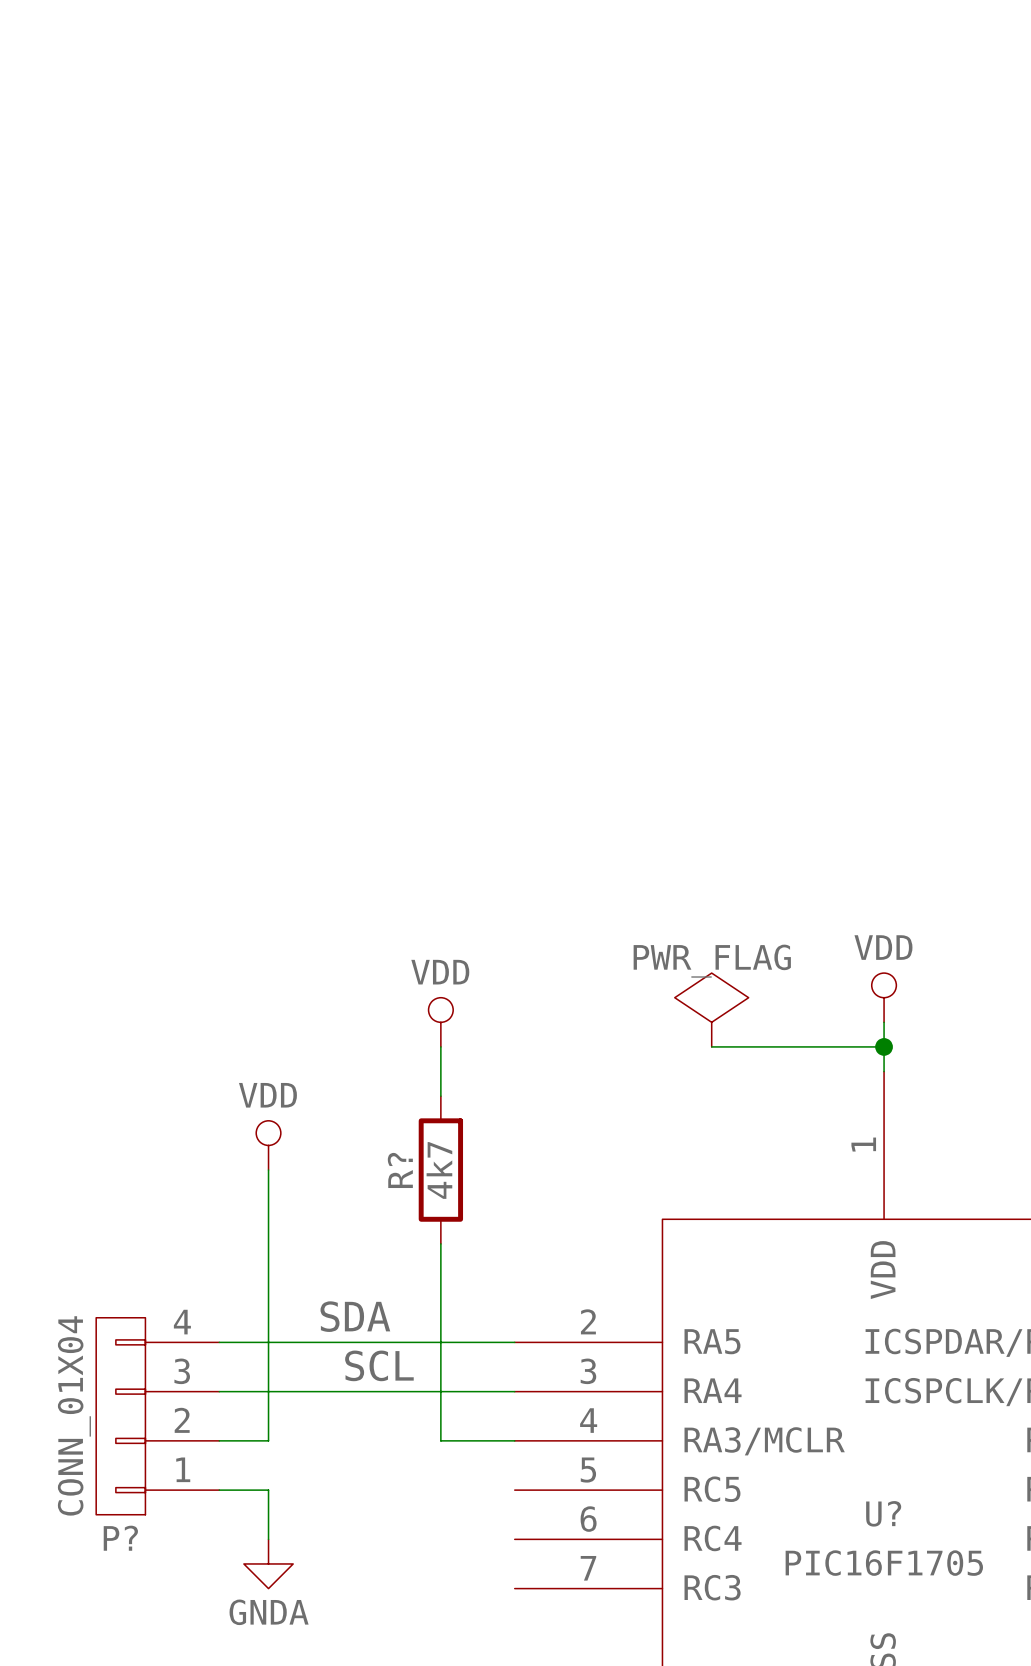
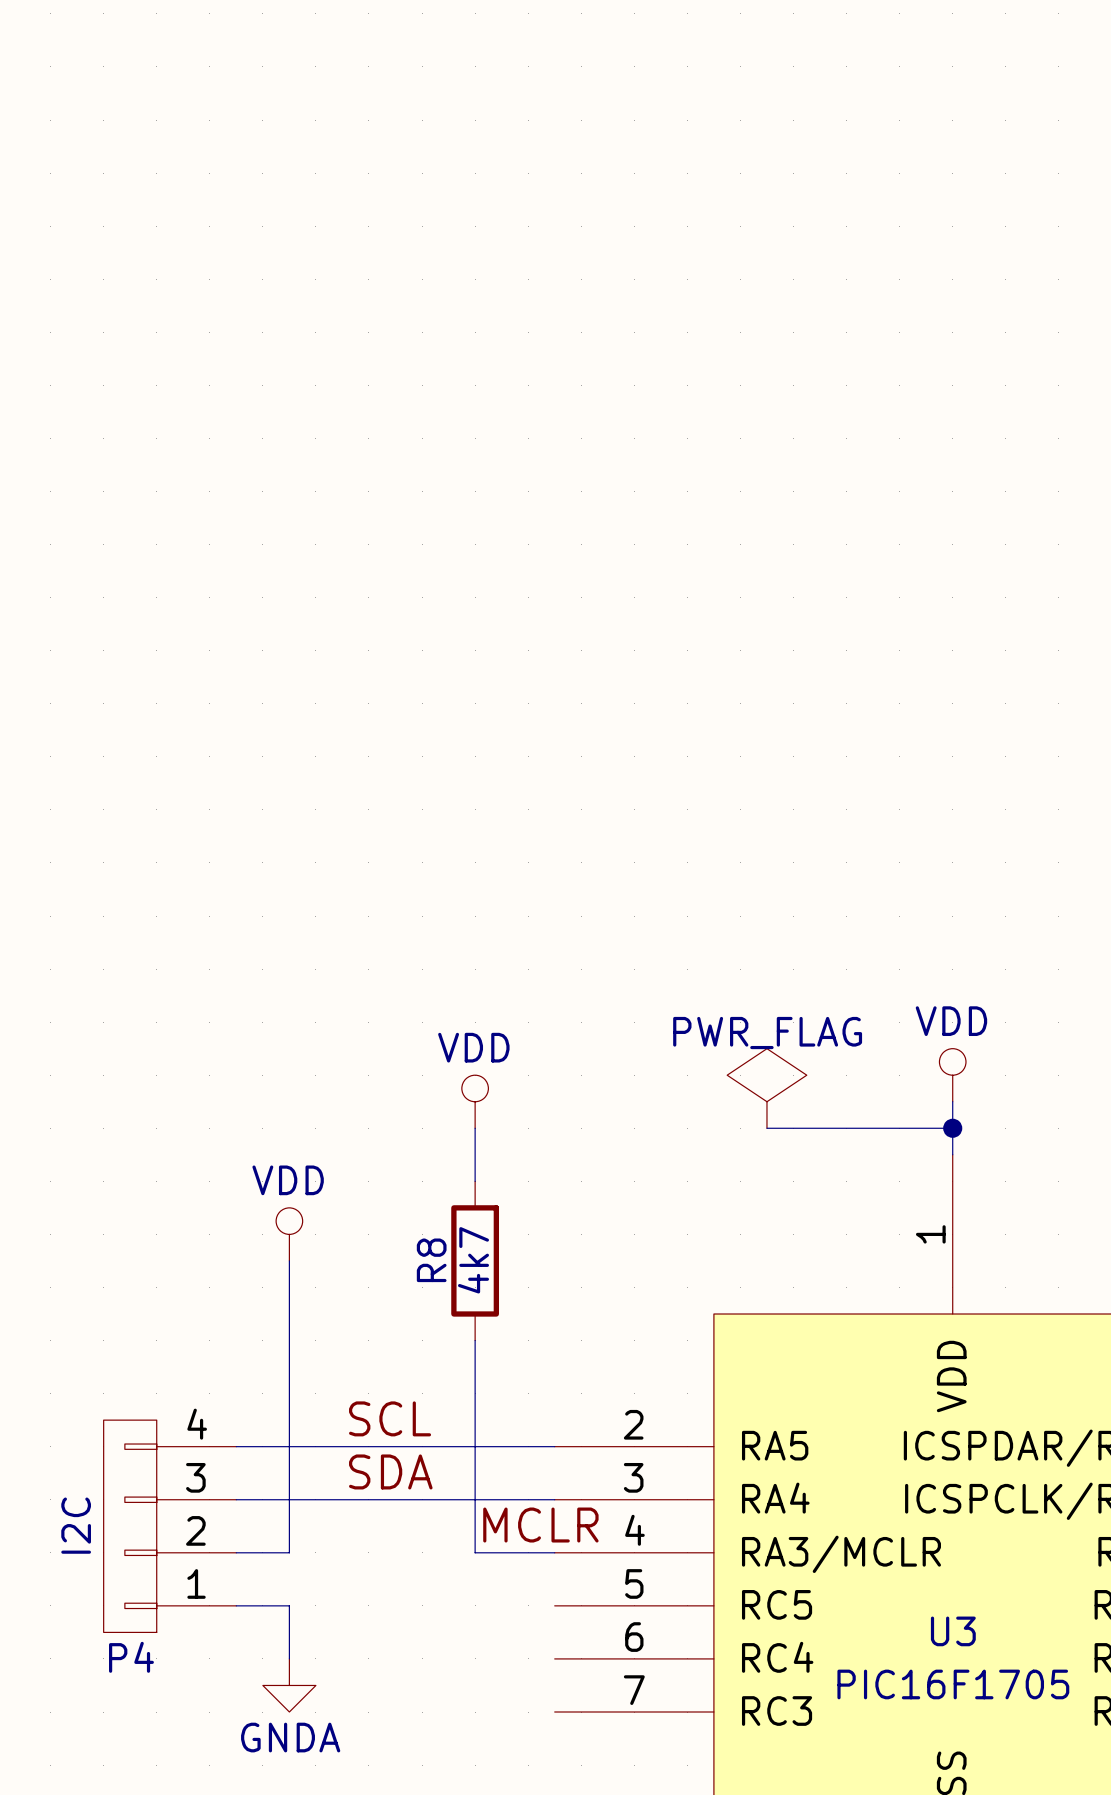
R? name: R? (400, 1170) -> R8 (431, 1260)
label: SDA (355, 1316) -> SCL (390, 1418)
label: none -> SDA (390, 1471)
label: SCL (379, 1365) -> none
P? value: CONN_01X04 (74, 1415) -> I2C (76, 1525)
label: none -> MCLR (540, 1525)
U? name: U? (883, 1513) -> U3 (953, 1631)
P? name: P? (120, 1538) -> P4 (131, 1657)

